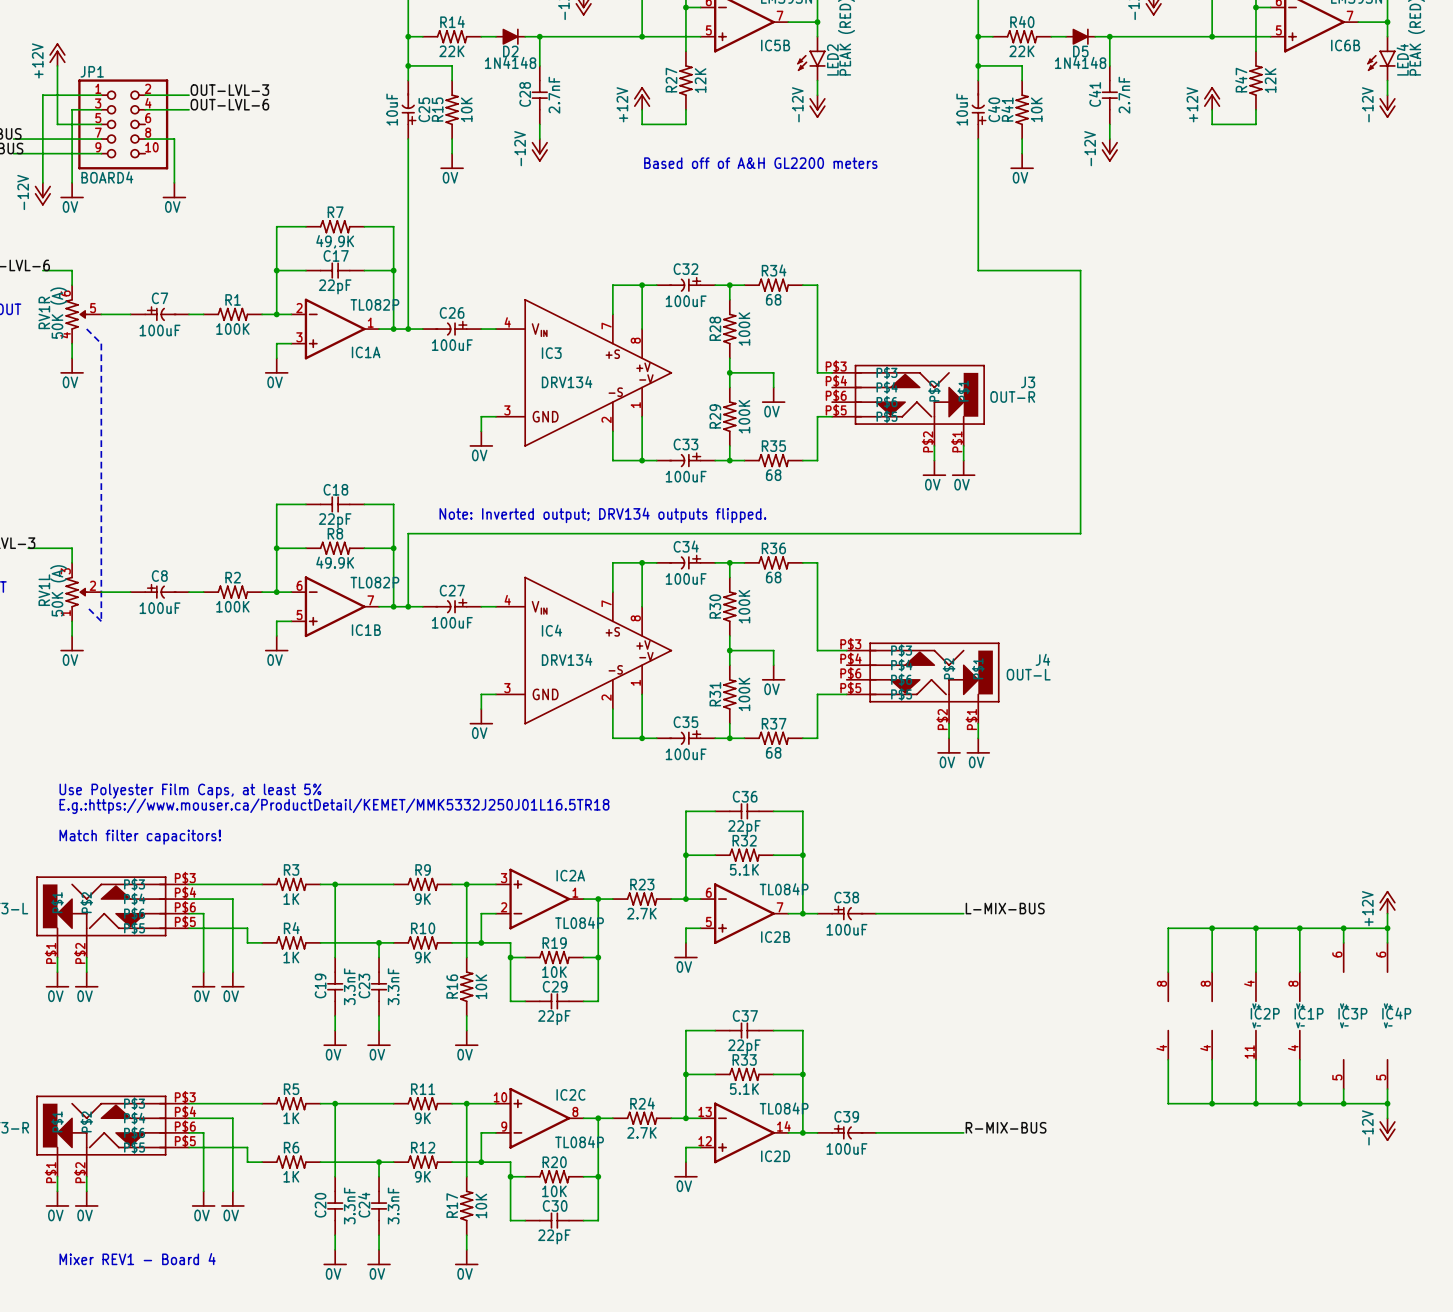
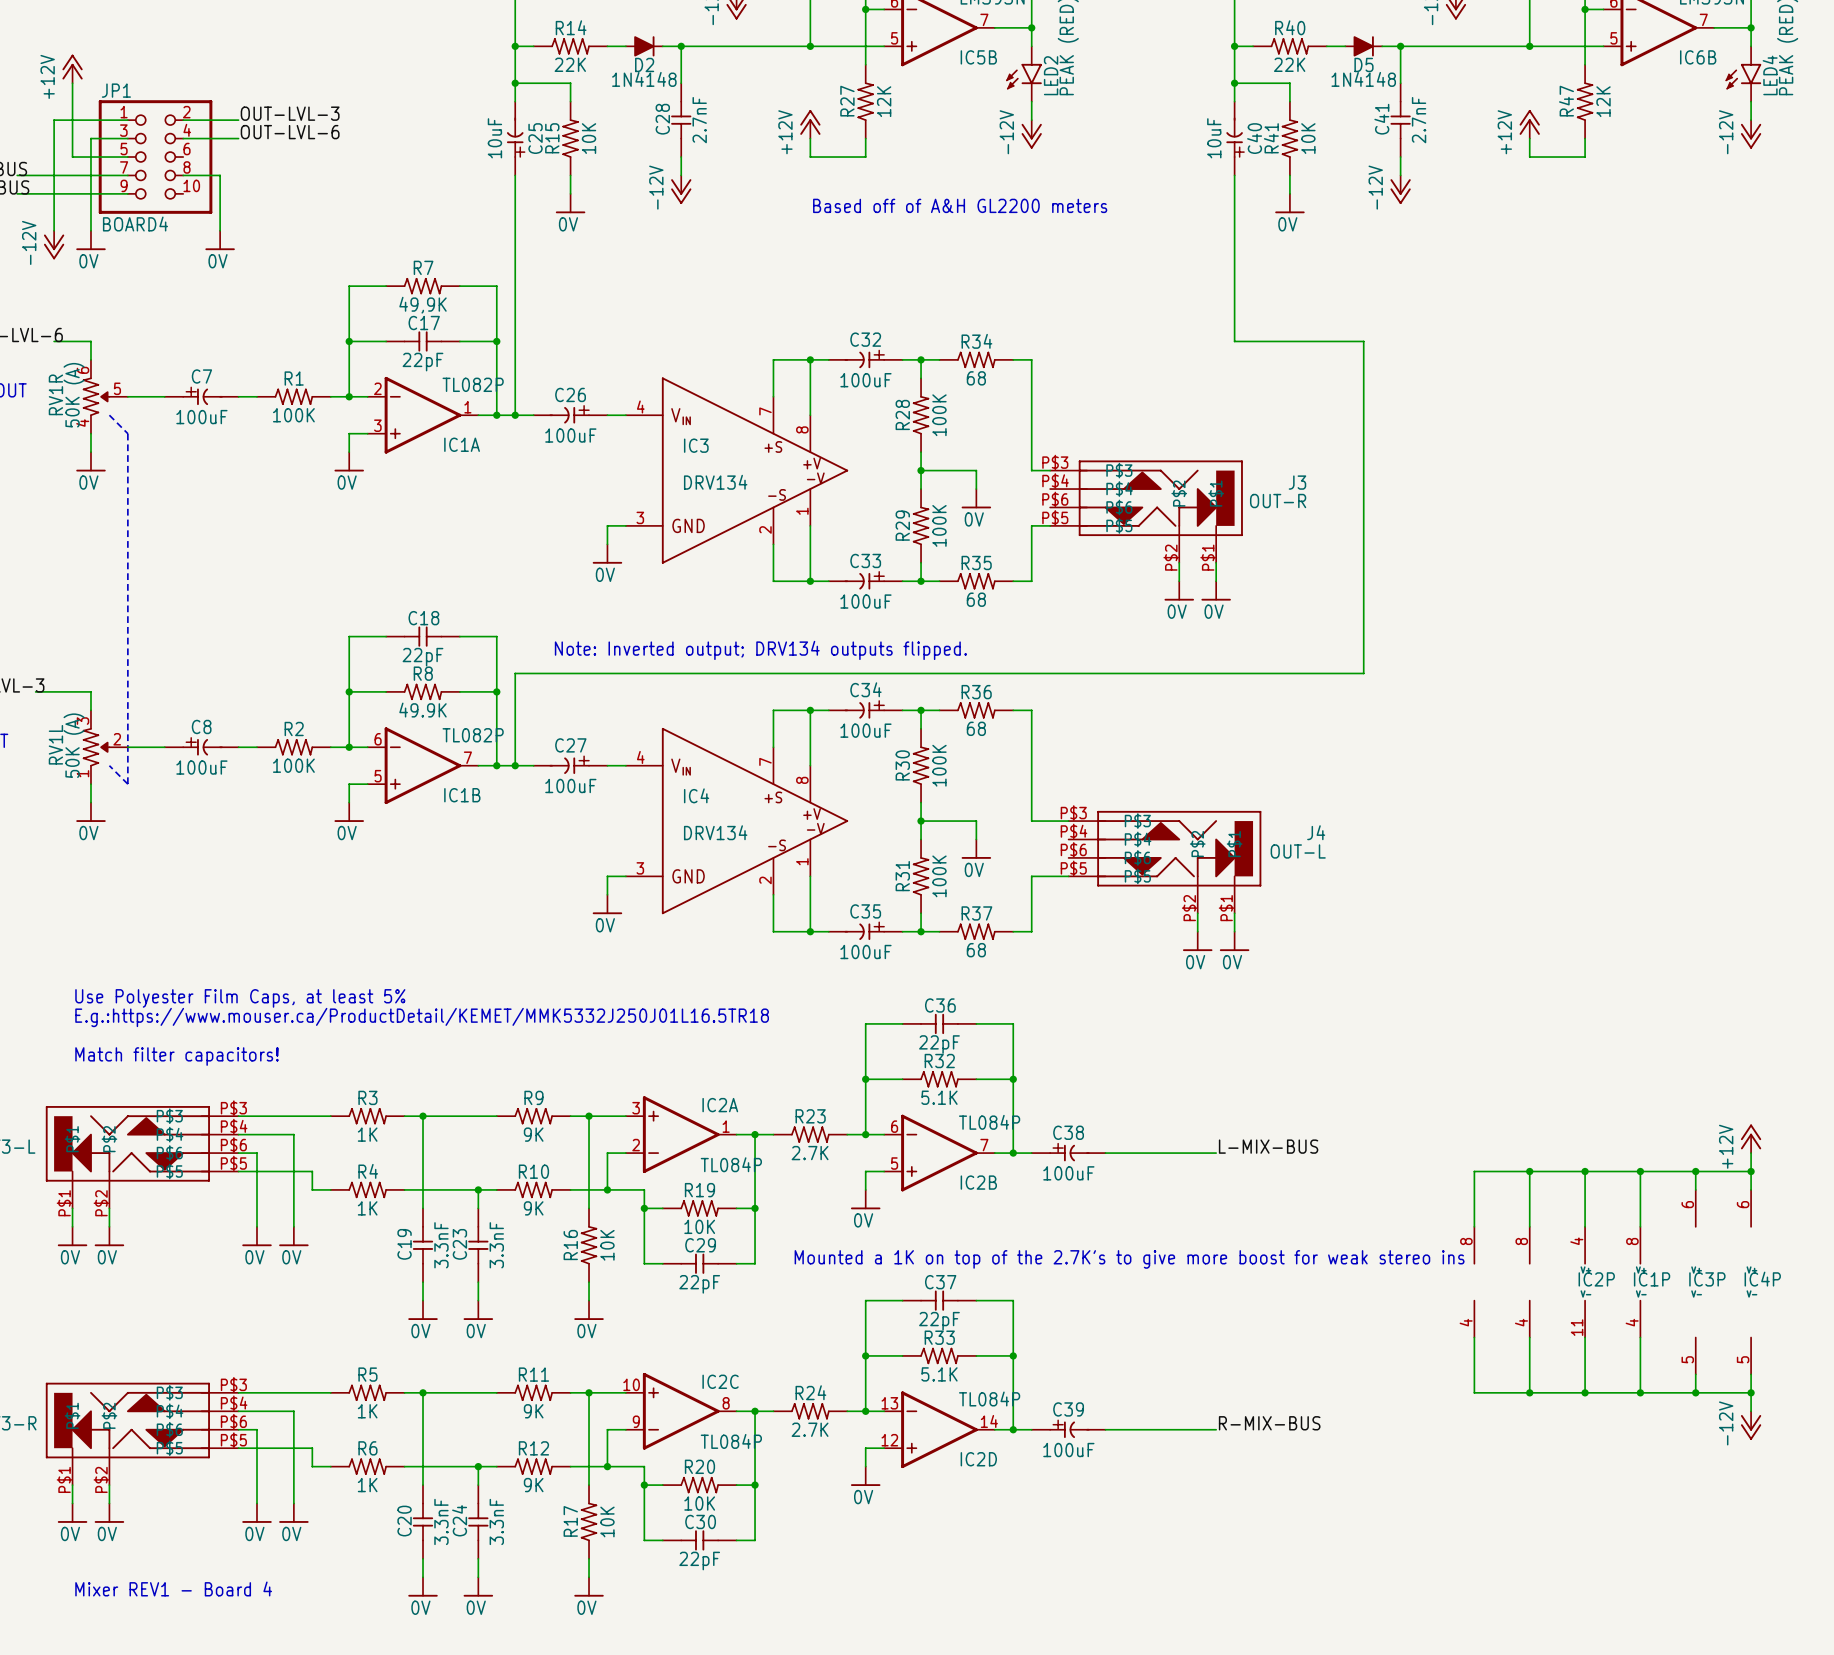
text: none -> Mounted a 1K on top of the 2.7K's to give more boost for weak stereo ins (1129, 1259)

